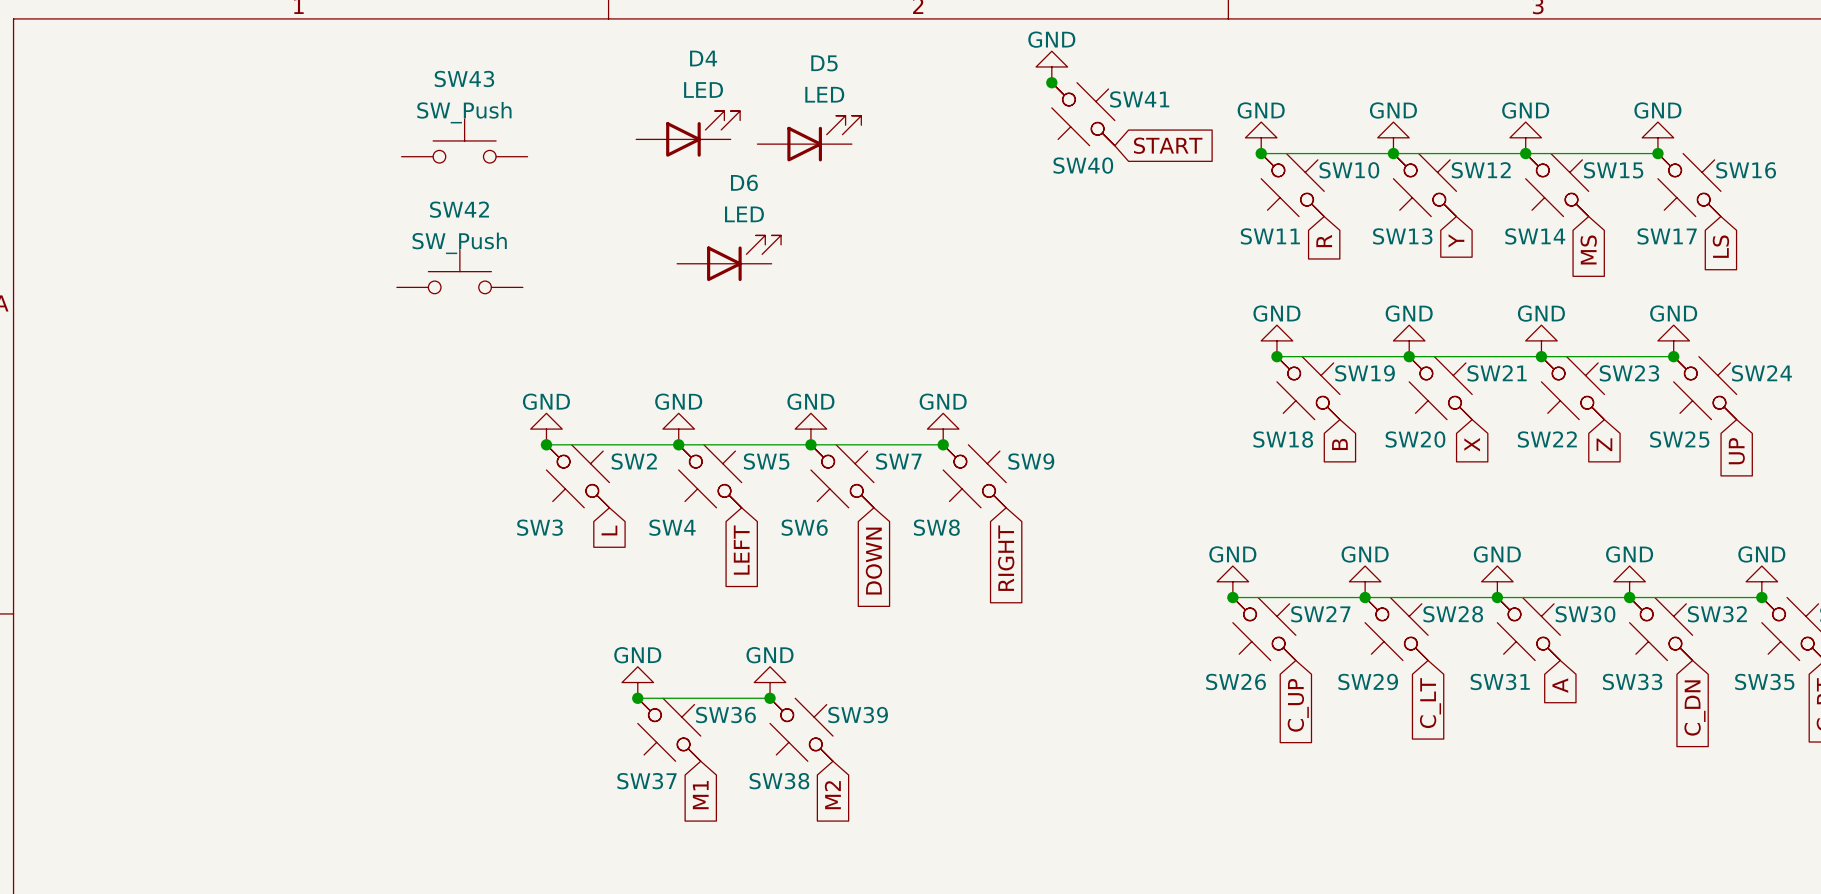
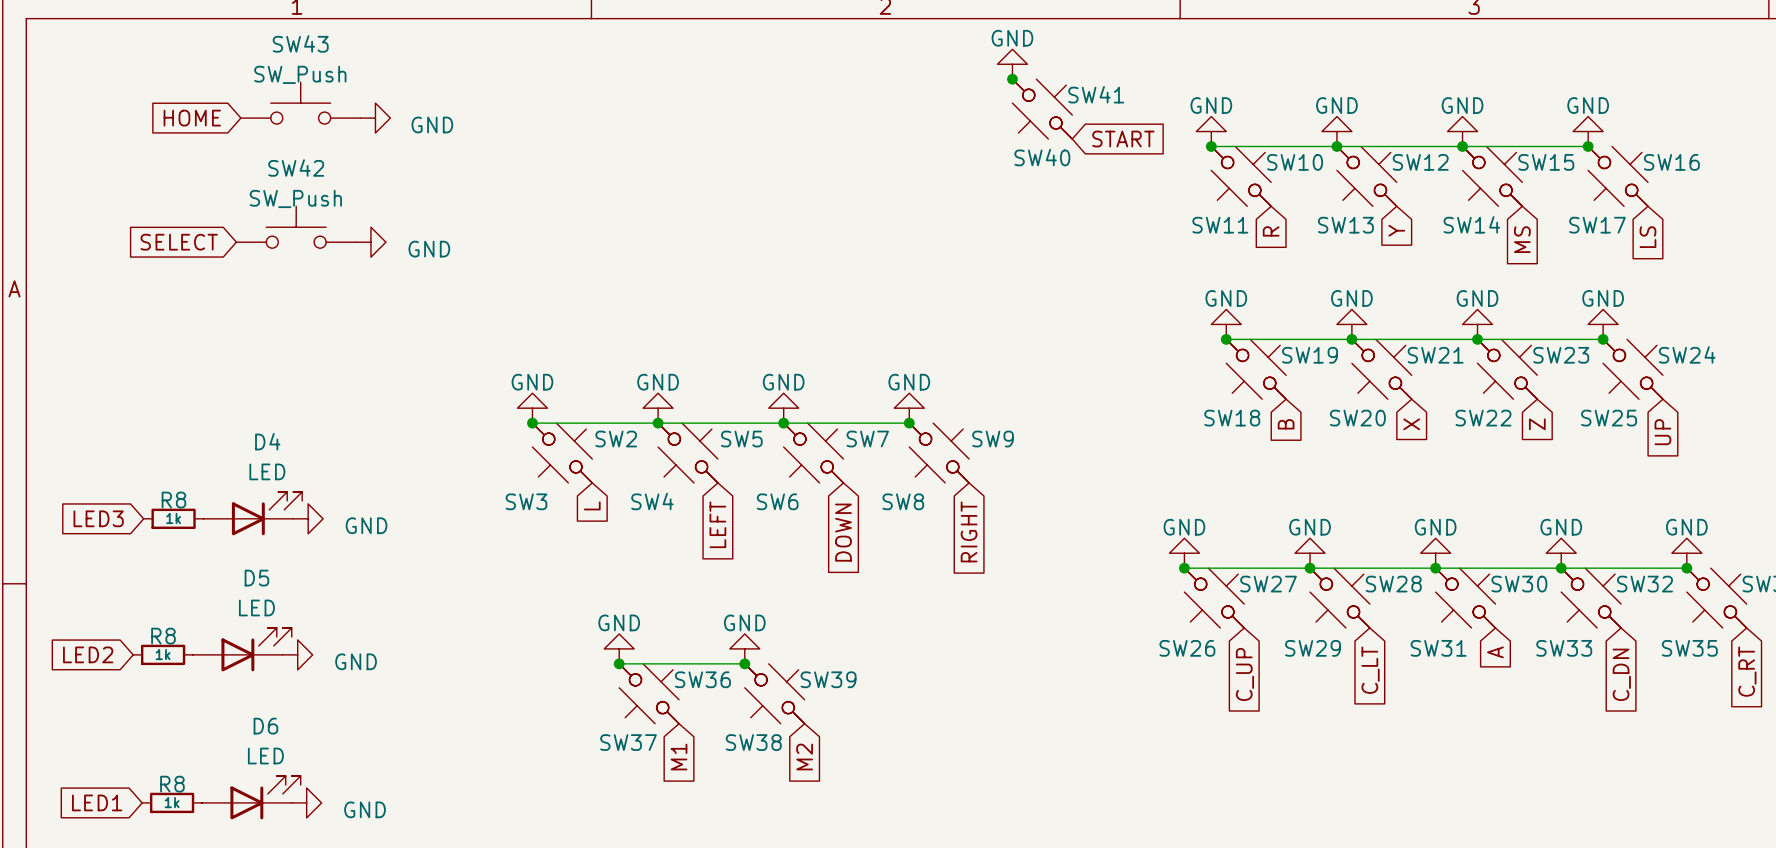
global label: none -> HOME (192, 118)
power symbol: none -> GND (375, 118)
D4 position: (688, 133) -> (252, 513)
D5 position: (809, 138) -> (242, 649)
SW43 position: (464, 140) -> (300, 103)
global label: none -> SELECT (179, 242)
power symbol: none -> GND (370, 242)
D6 position: (729, 258) -> (251, 797)
SW42 position: (459, 271) -> (296, 227)
global label: none -> LED3 (98, 518)
R8: none -> 1k (173, 518)
power symbol: none -> GND (308, 518)
global label: none -> LED2 (88, 654)
R8: none -> 1k (163, 654)
power symbol: none -> GND (297, 654)
global label: none -> LED1 (97, 802)
R8: none -> 1k (172, 802)
power symbol: none -> GND (306, 802)

